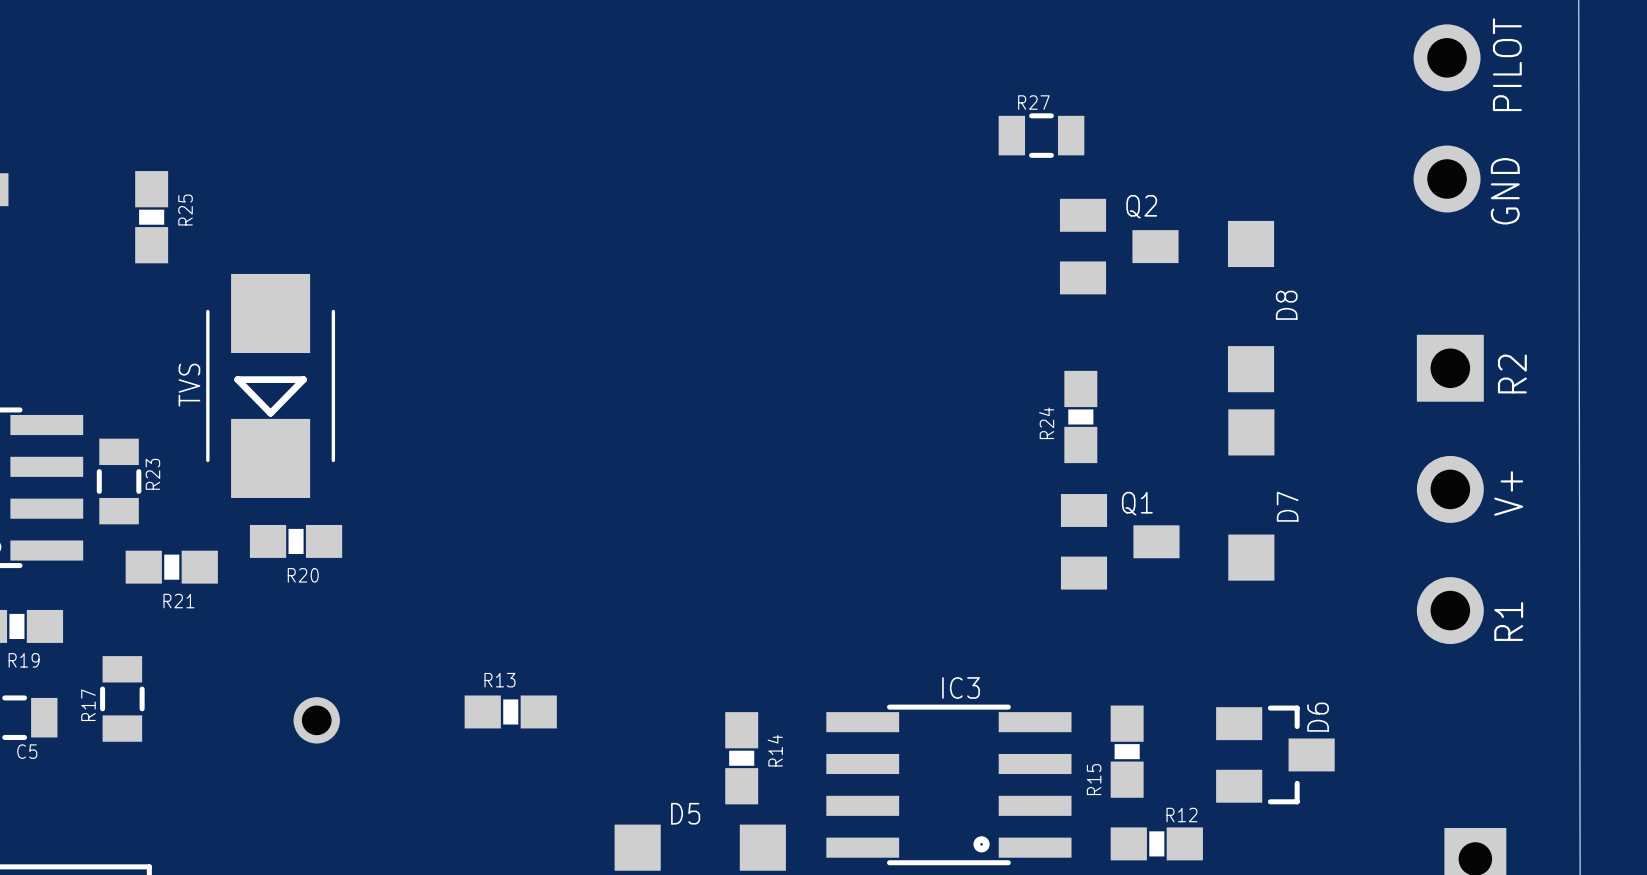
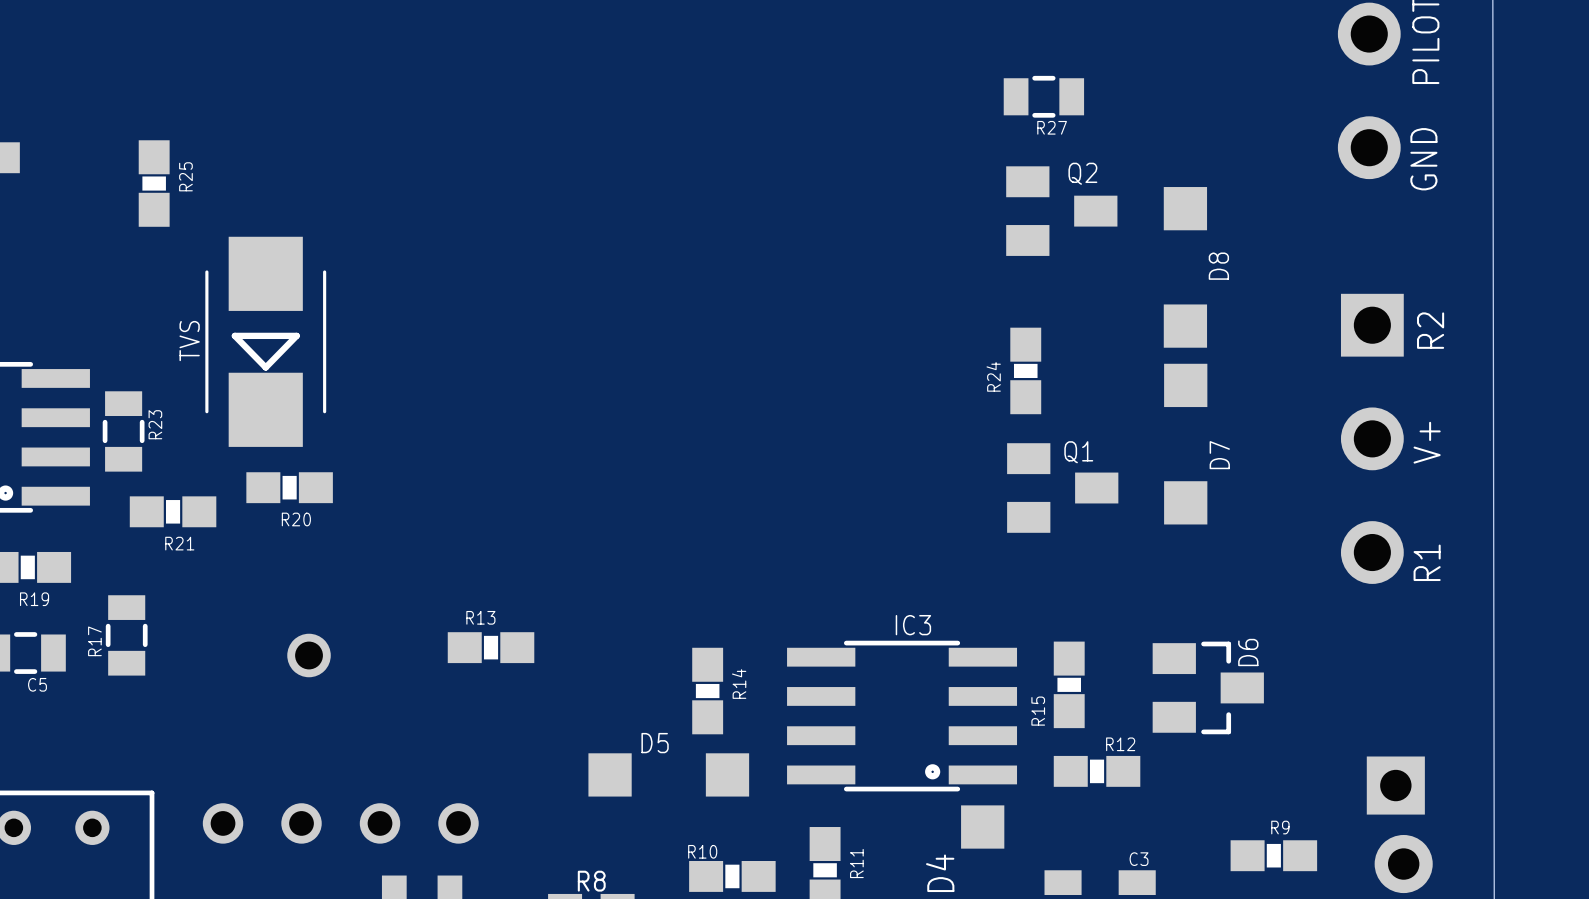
R27 name position: R27 (1033, 102) -> R27 (1052, 127)
R27 position: (1041, 135) -> (1043, 96)

